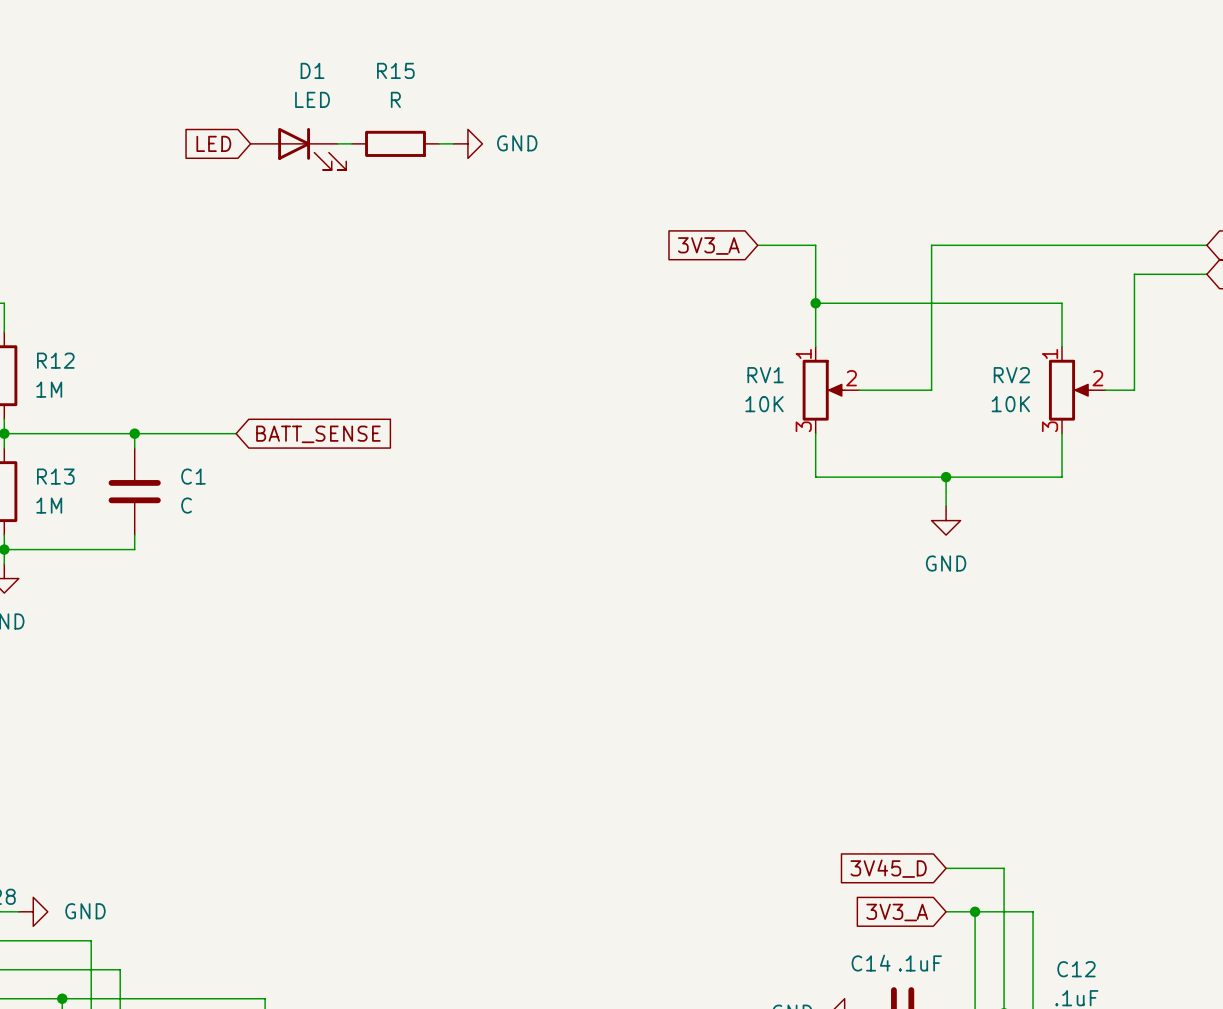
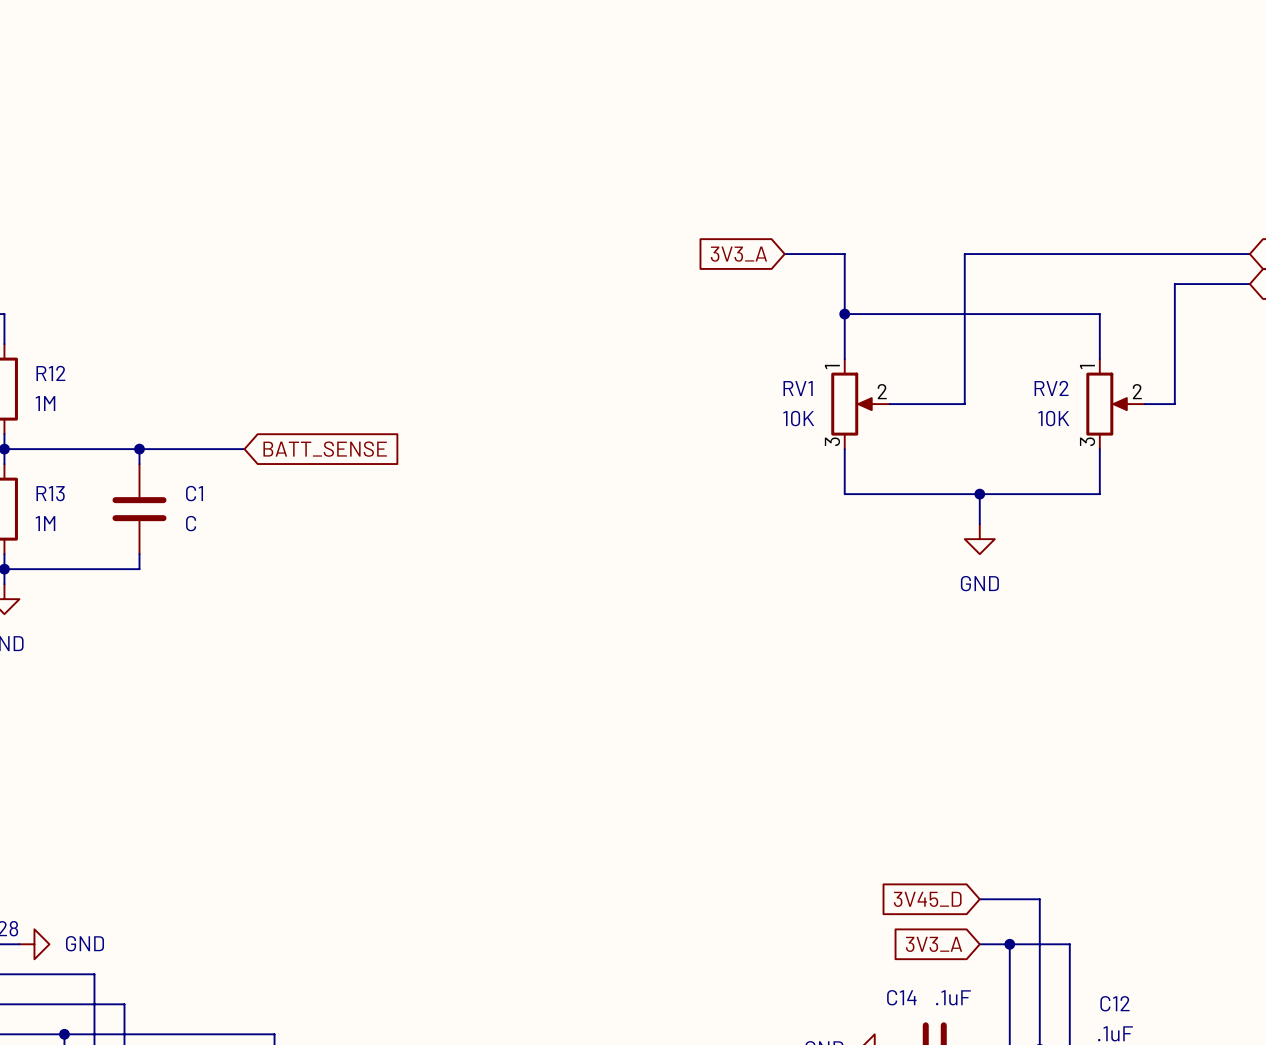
global label: LED (213, 143) -> none
wire: (337, 143) (352, 143) -> none
R15: R (395, 143) -> none
wire: (438, 143) (453, 143) -> none
power symbol: GND (467, 143) -> none
D1: LED (298, 148) -> none

